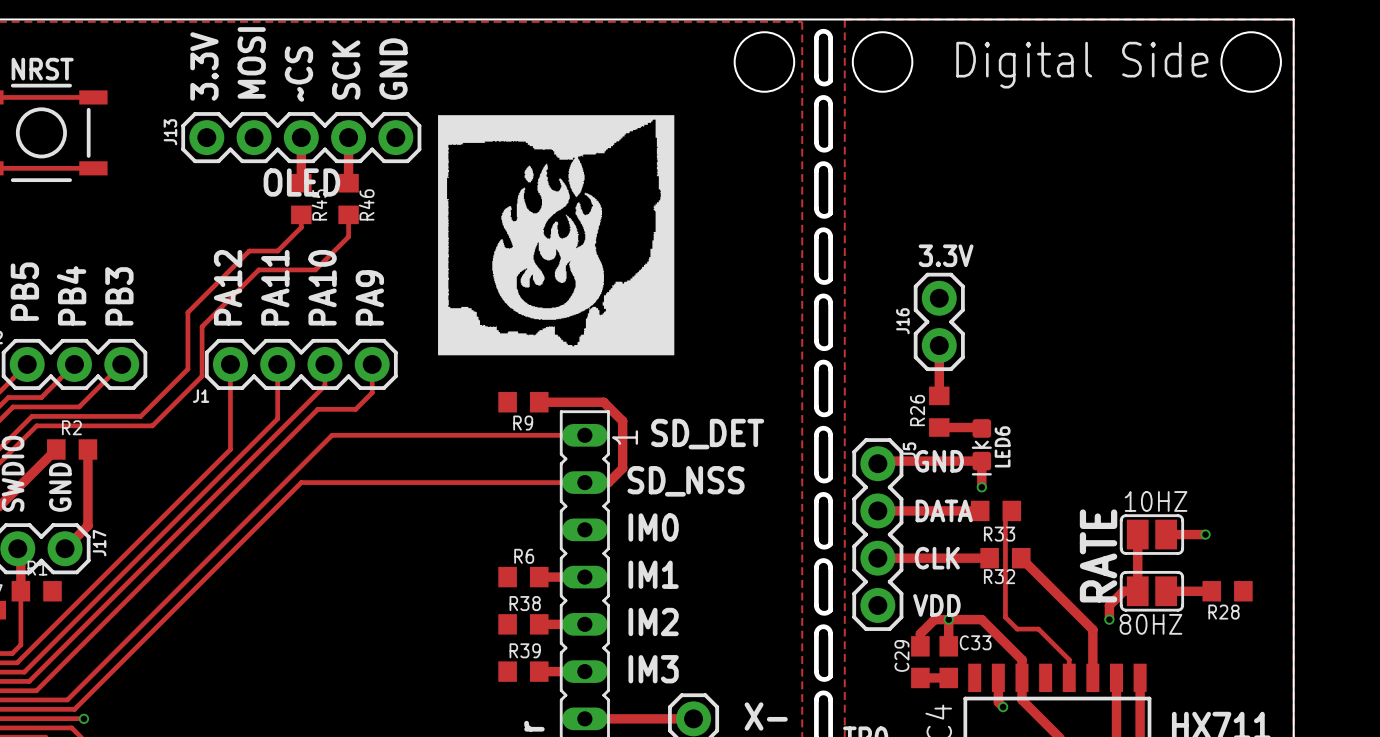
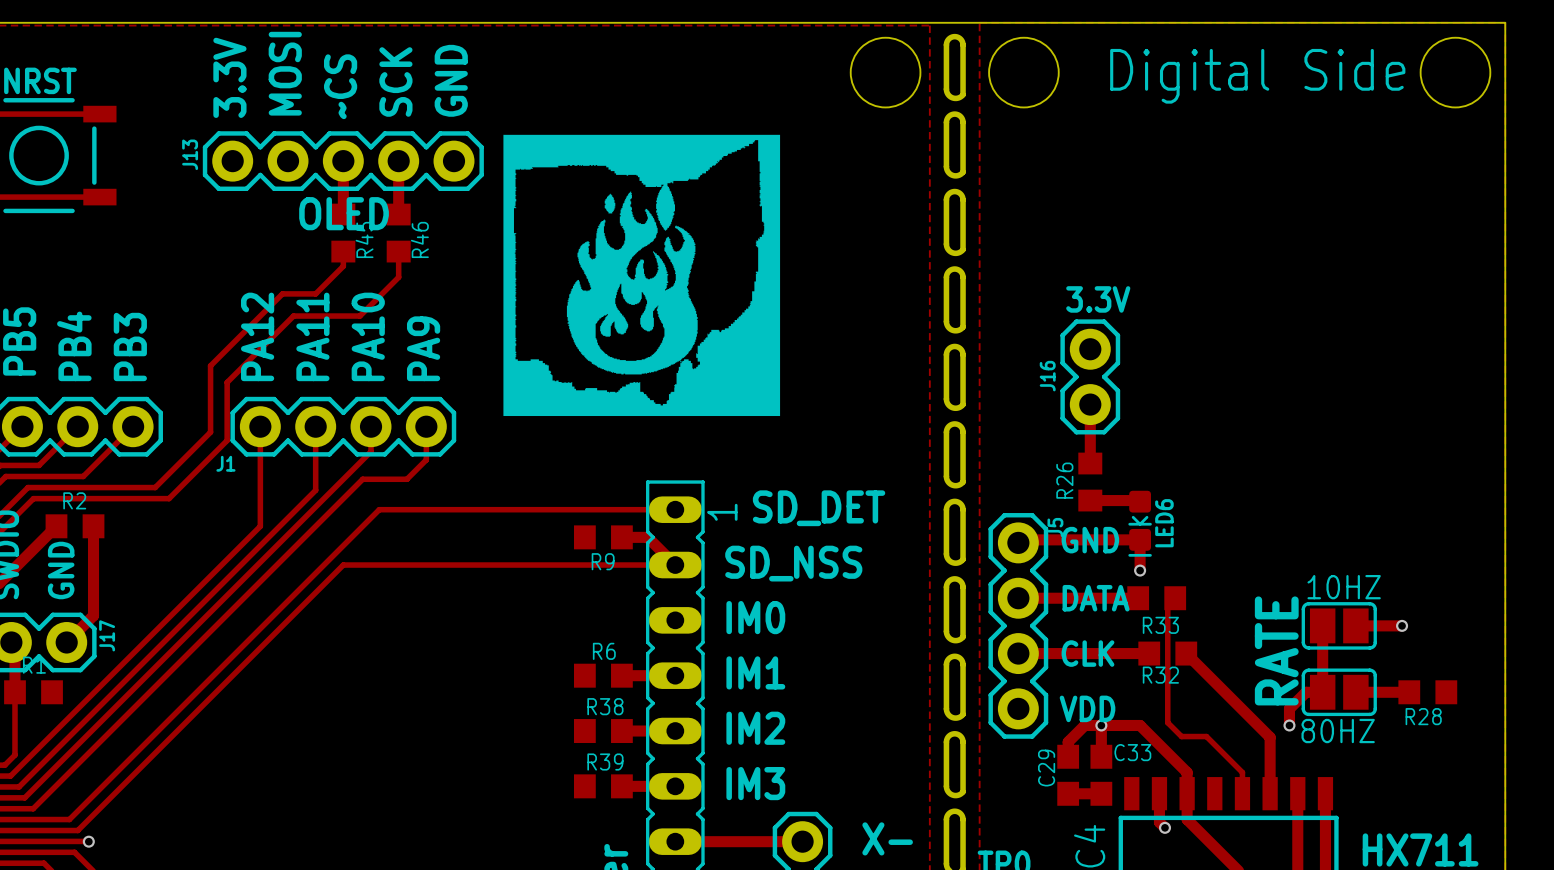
R9 position: (523, 402) -> (603, 537)
track: (539, 402) (603, 402) (622, 421) (622, 468) (608, 482) (584, 482) -> (621, 537) (647, 537) (675, 565)

